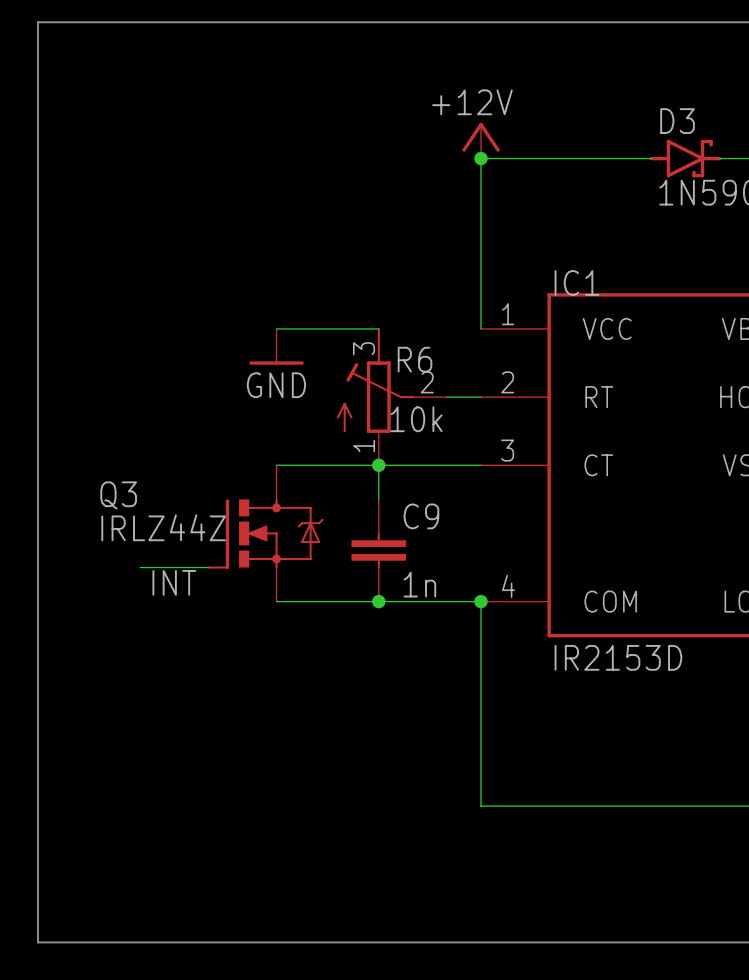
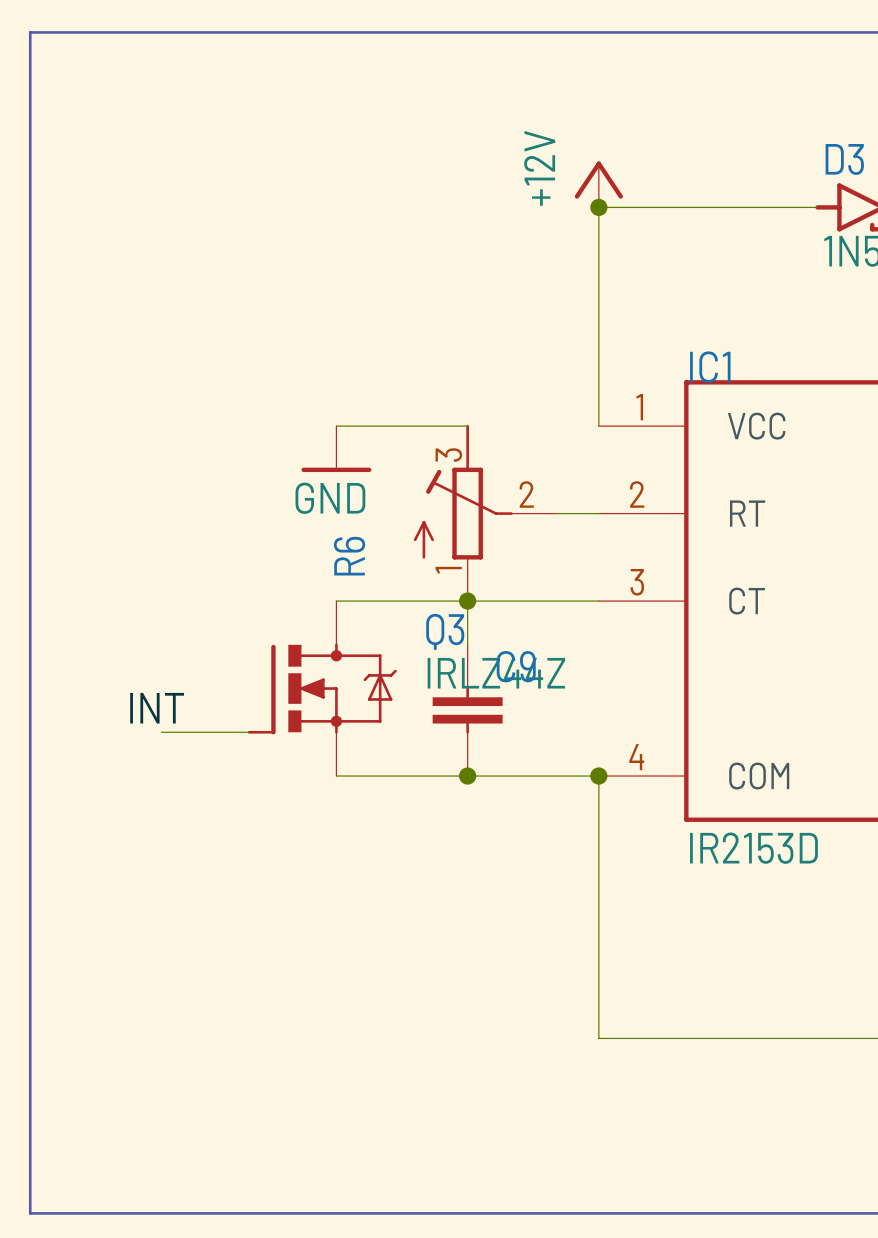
power symbol text rotation: 0° (472, 102) -> 90° counterclockwise (539, 168)
R6 name rotation: 0° (415, 359) -> 90° counterclockwise (349, 556)
R6 name position: R6 (415, 359) -> R6 (349, 556)
R6 value: 10k (416, 419) -> none
Q3 name position: Q3 (118, 495) -> Q3 (445, 631)
Q3 value position: IRLZ44Z (163, 527) -> IRLZ44Z (496, 673)
label position: INT (174, 582) -> INT (157, 708)
C9 value: 1n (419, 584) -> none

